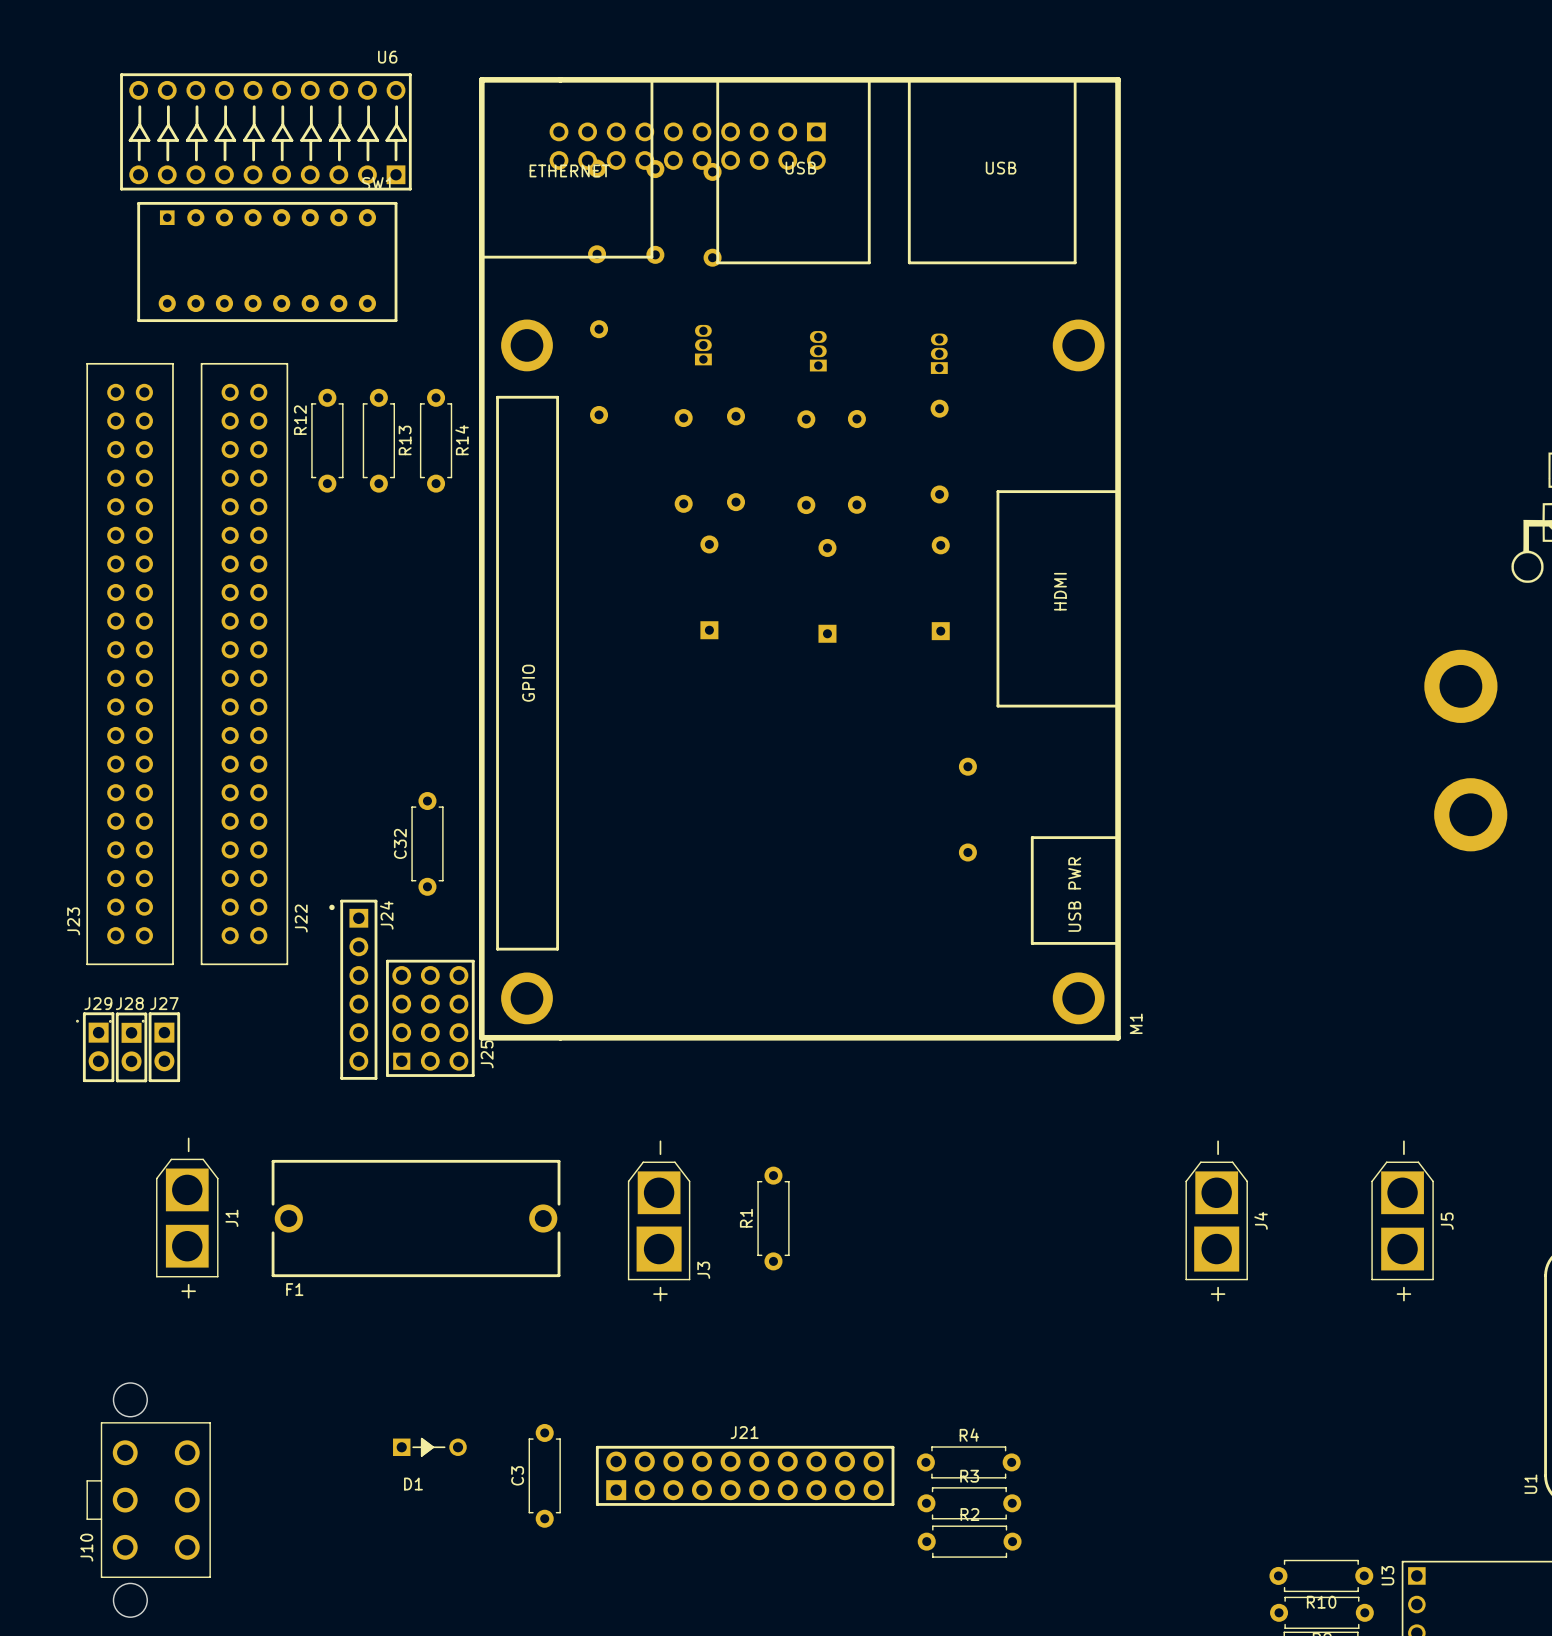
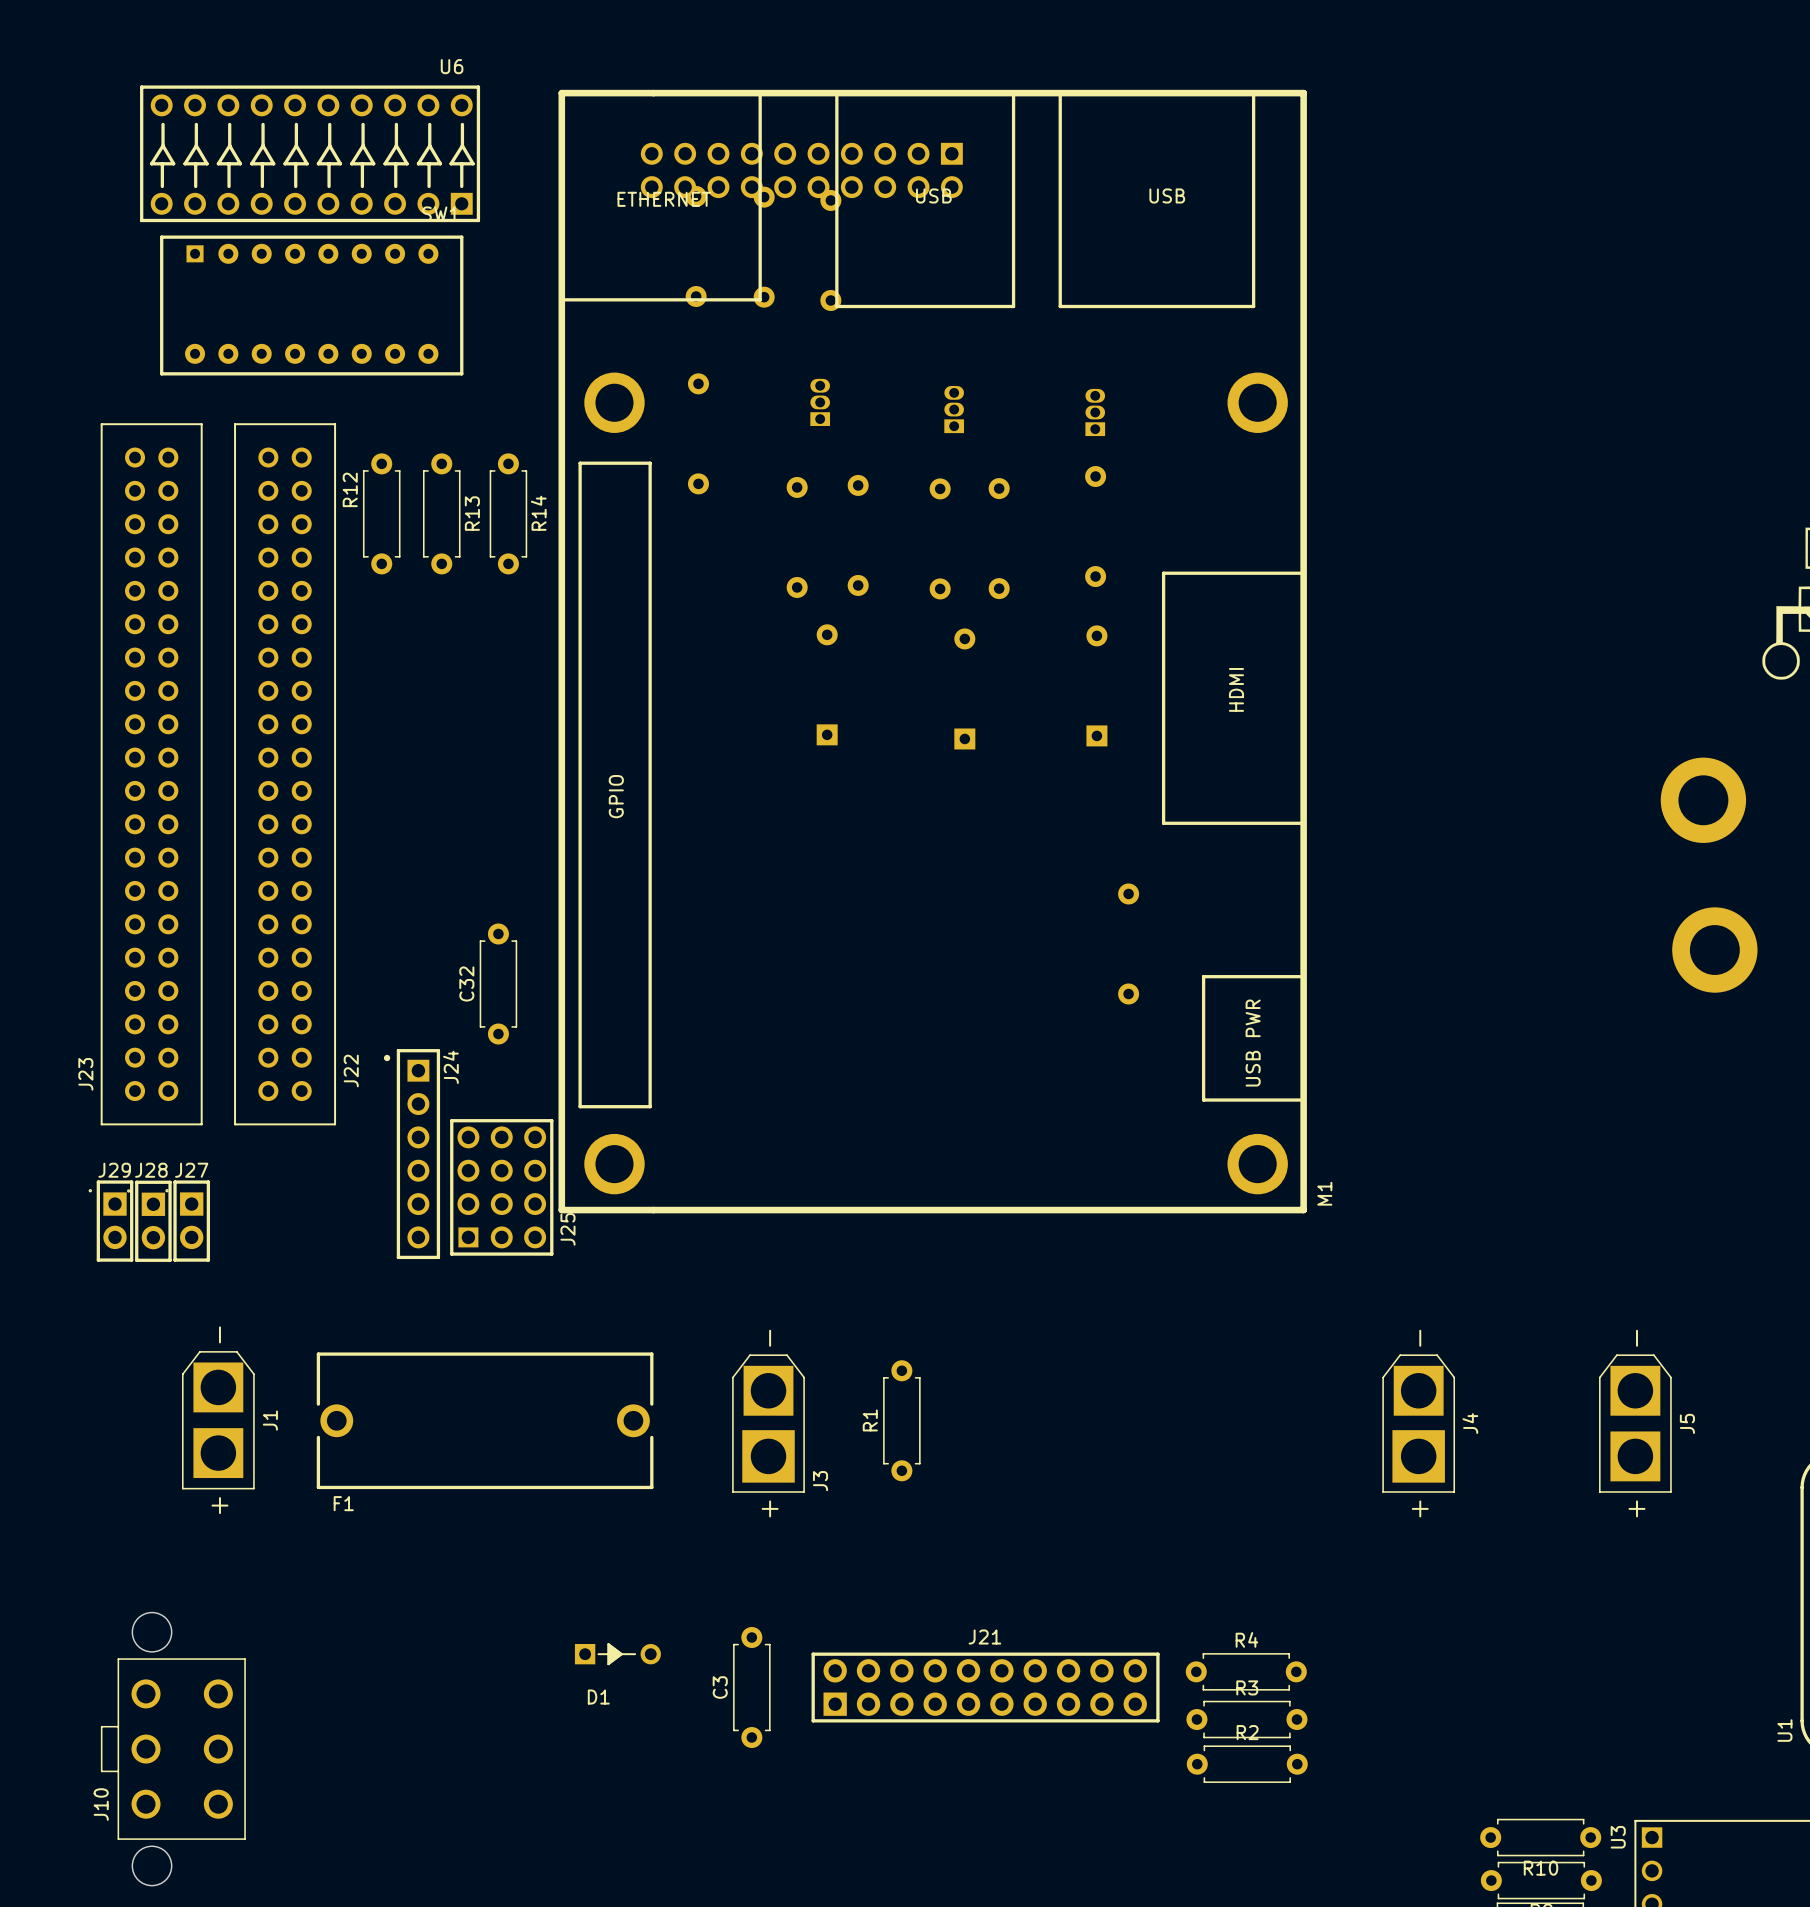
D1 position: (429, 1447) -> (617, 1654)
R4 position: (968, 1462) -> (1246, 1671)
C3 position: (544, 1475) -> (751, 1687)
J21 position: (745, 1475) -> (985, 1687)
R3 position: (969, 1503) -> (1246, 1719)
R2 position: (969, 1541) -> (1247, 1764)

